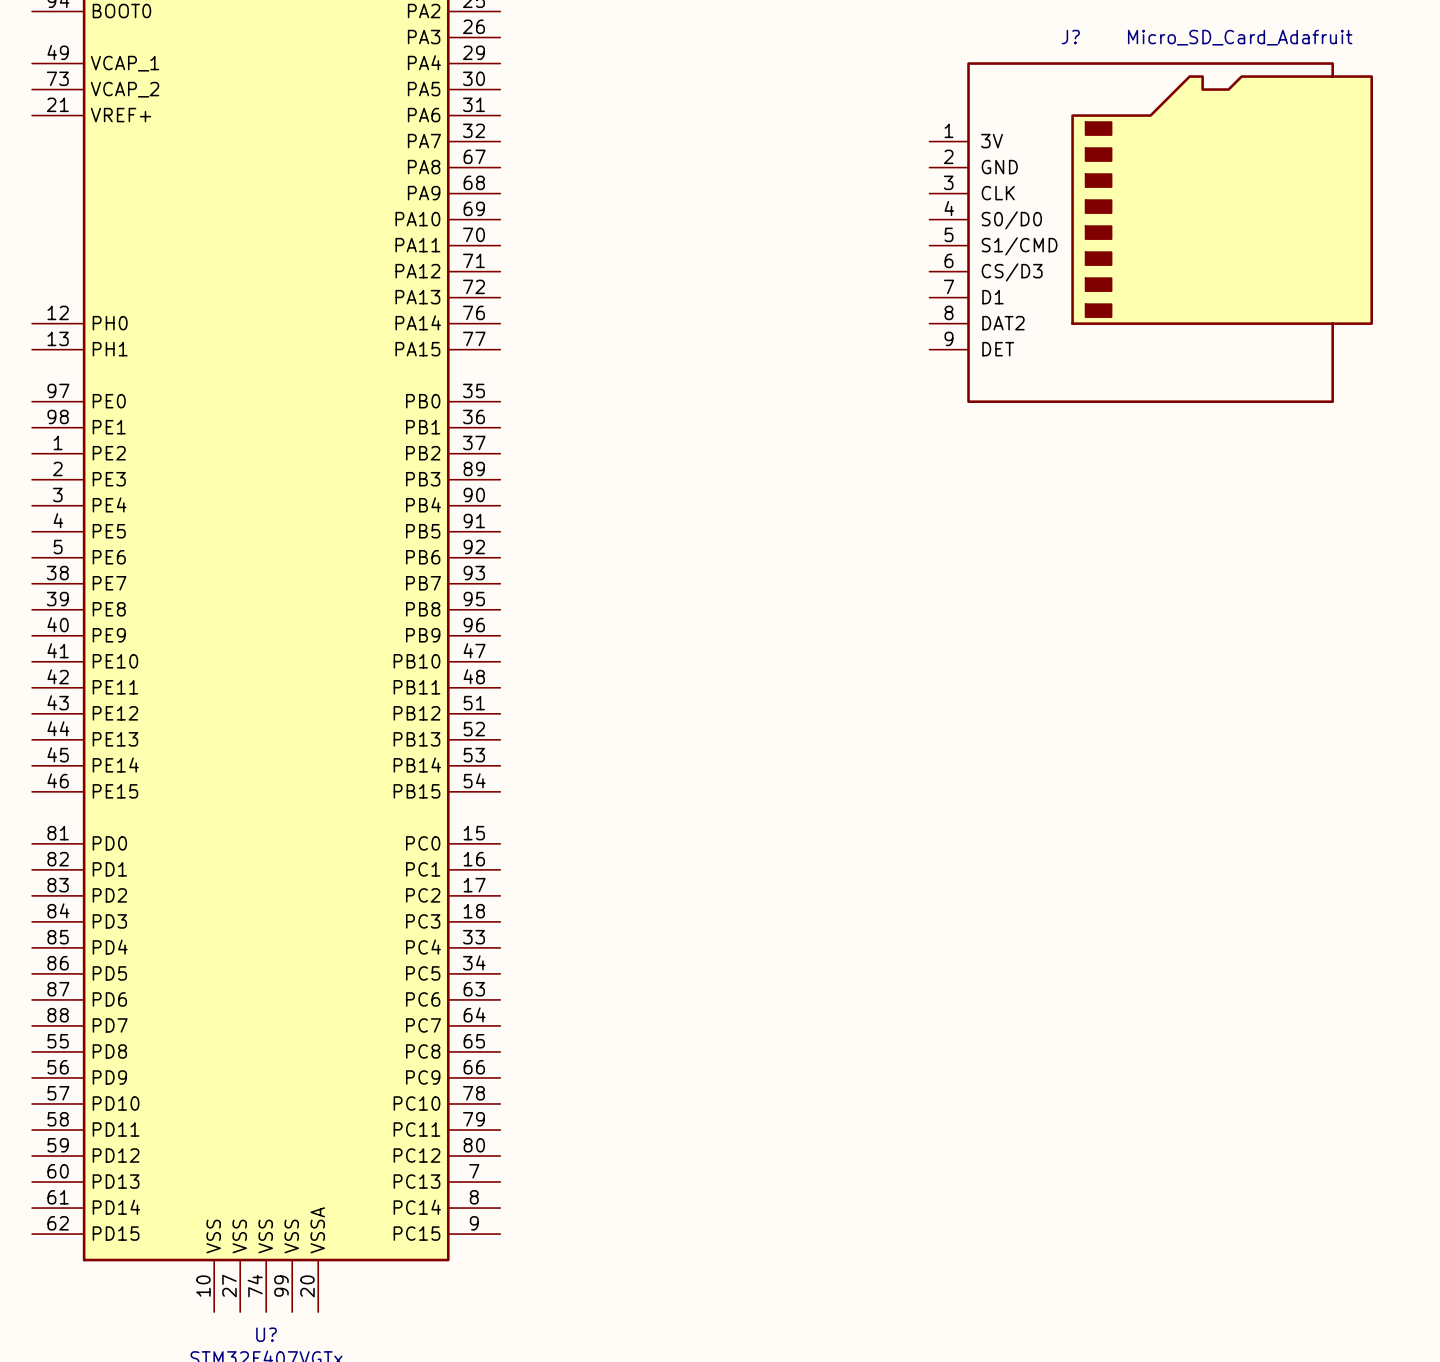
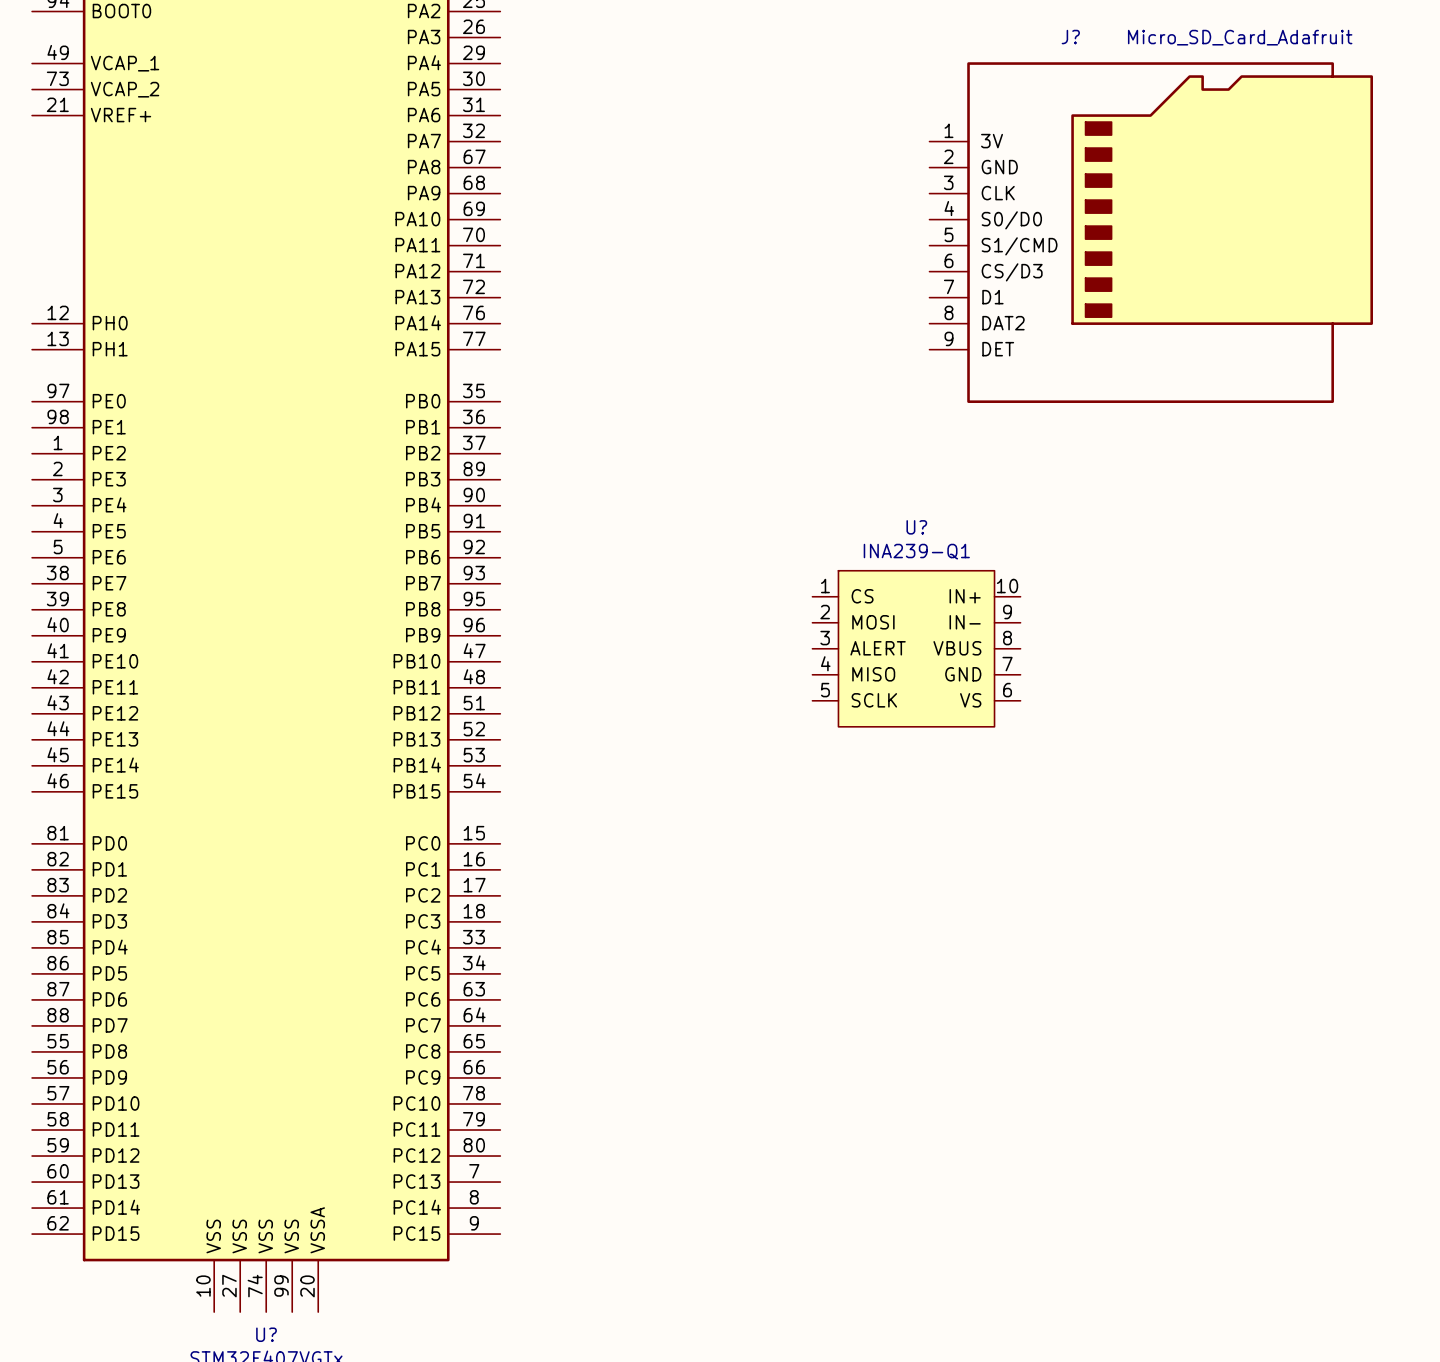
U?: none -> INA239-Q1 (916, 648)

